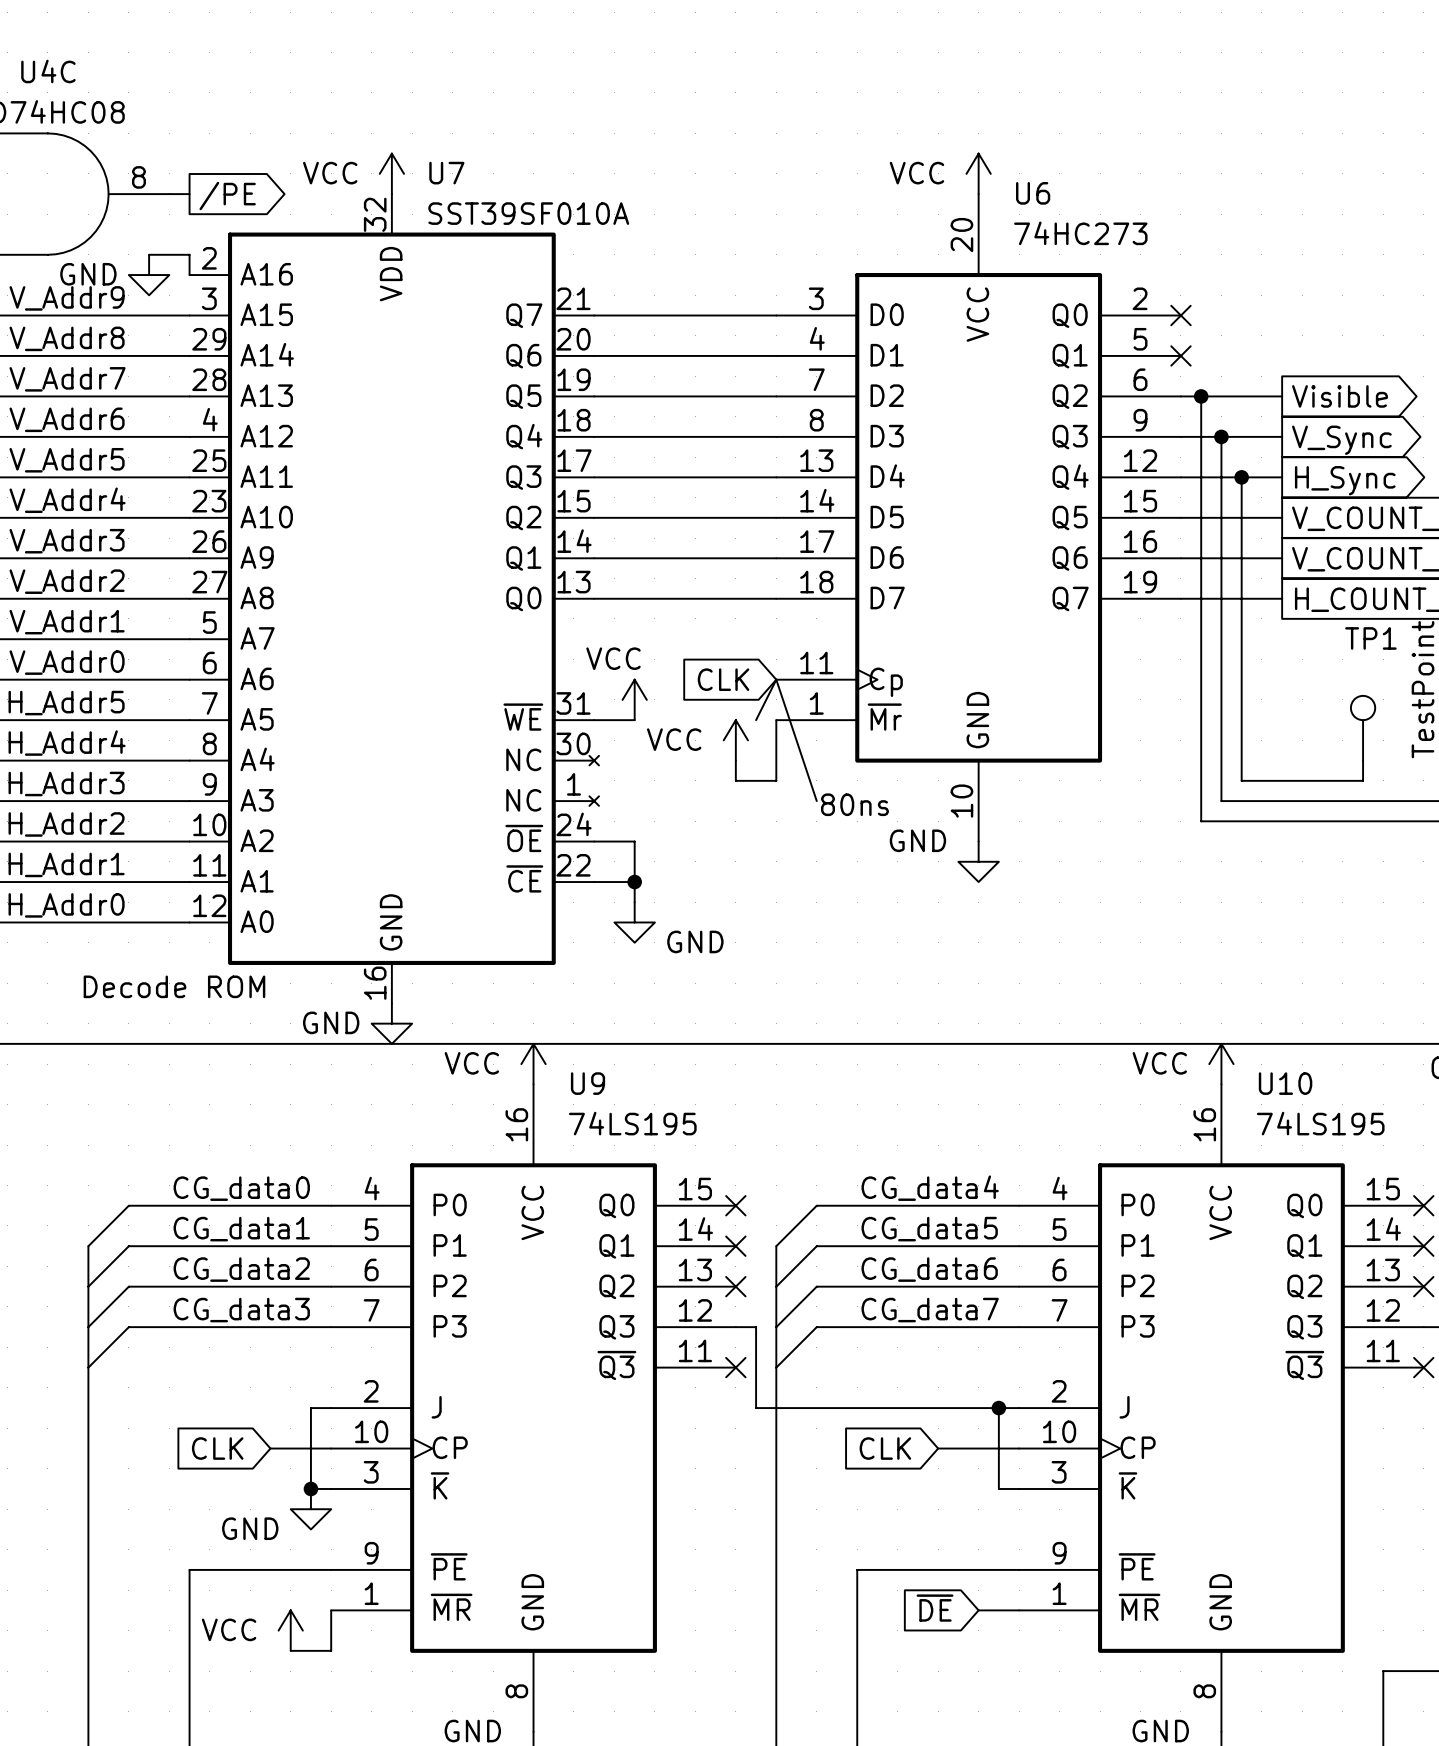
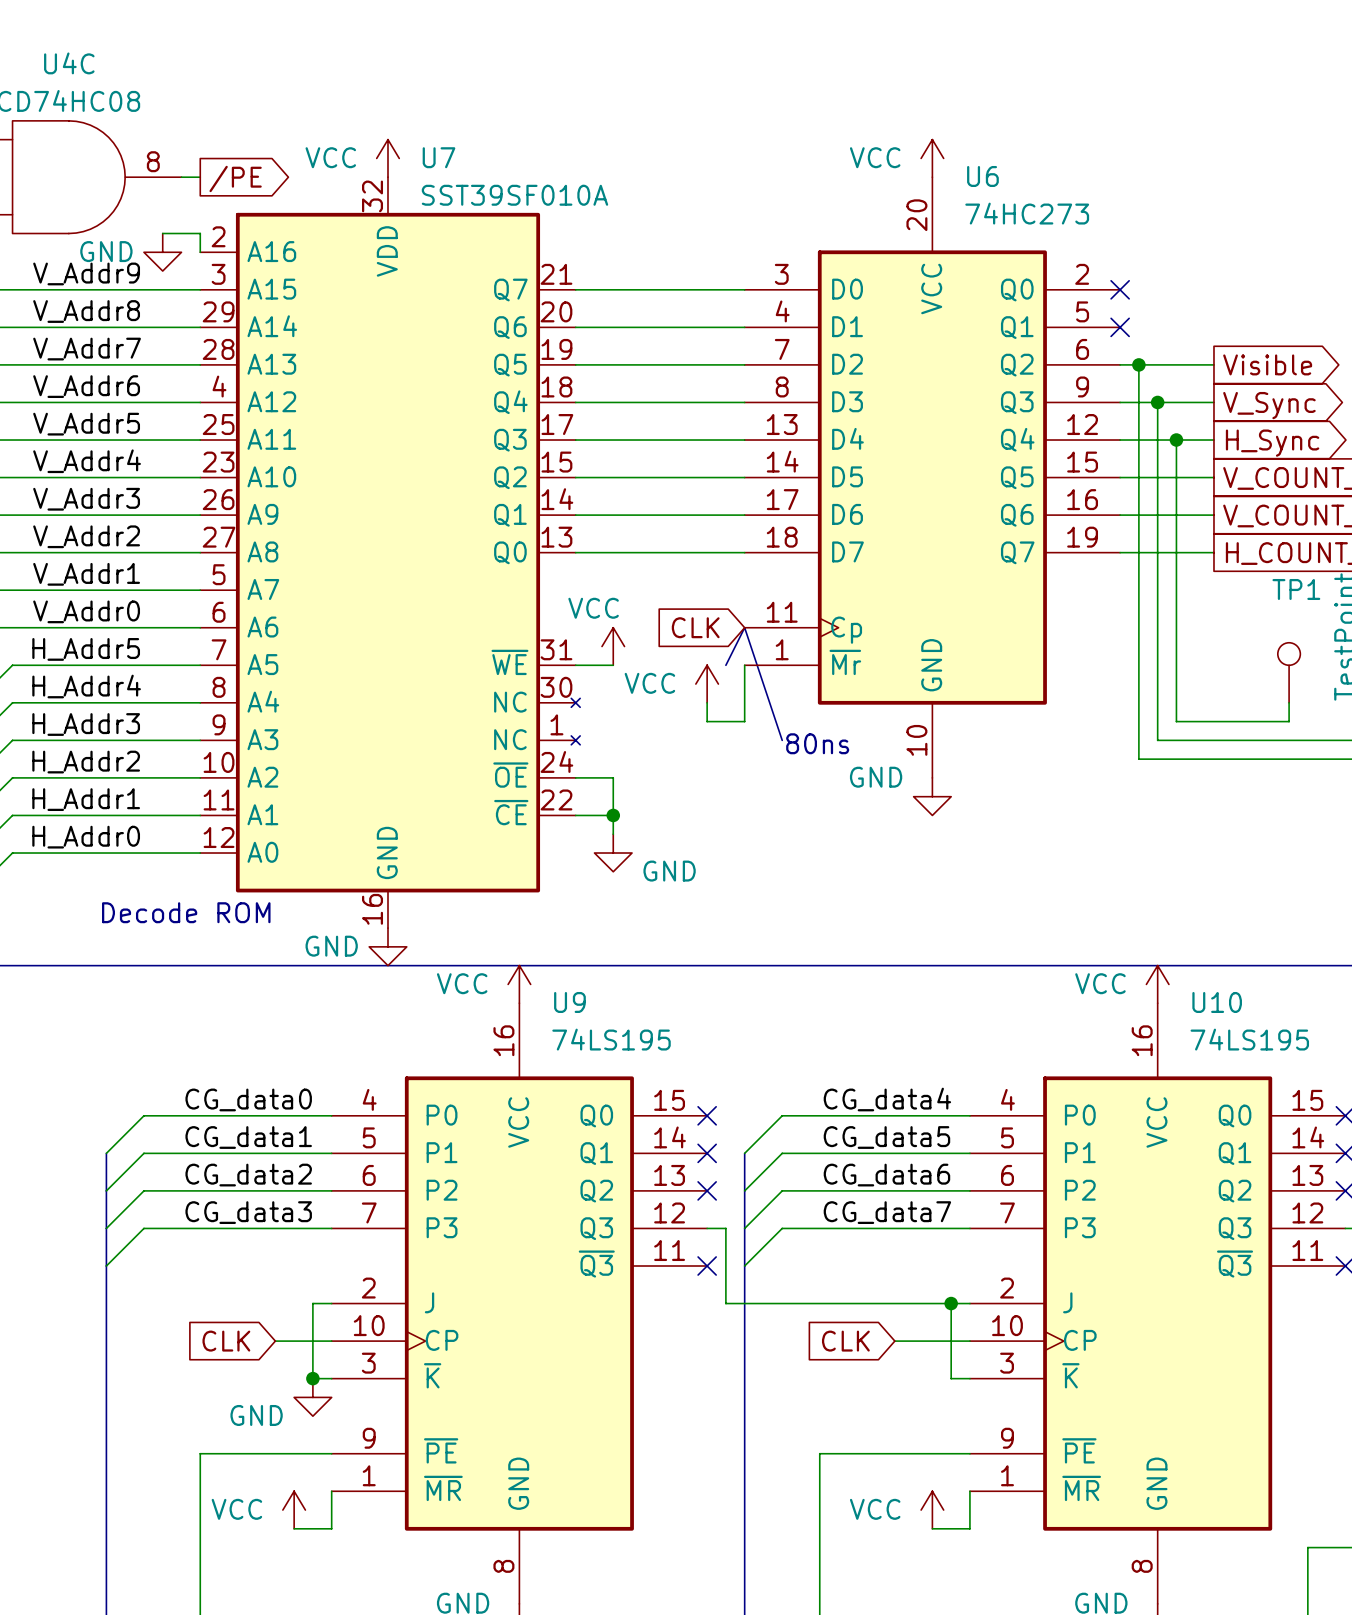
global label: ~{DE} (935, 1608) -> none
wire: (978, 1610) (1019, 1610) -> (932, 1528) (969, 1528) (969, 1491)
power symbol: none -> VCC (932, 1510)

